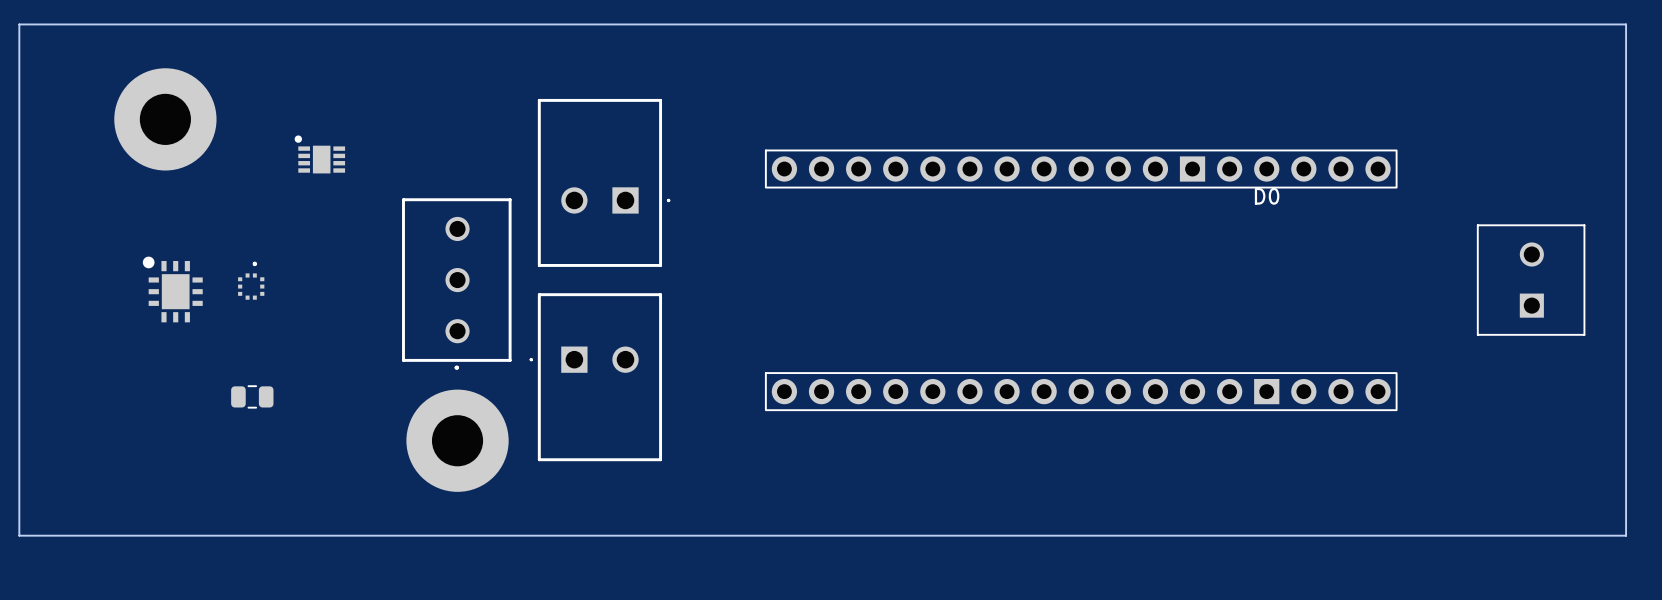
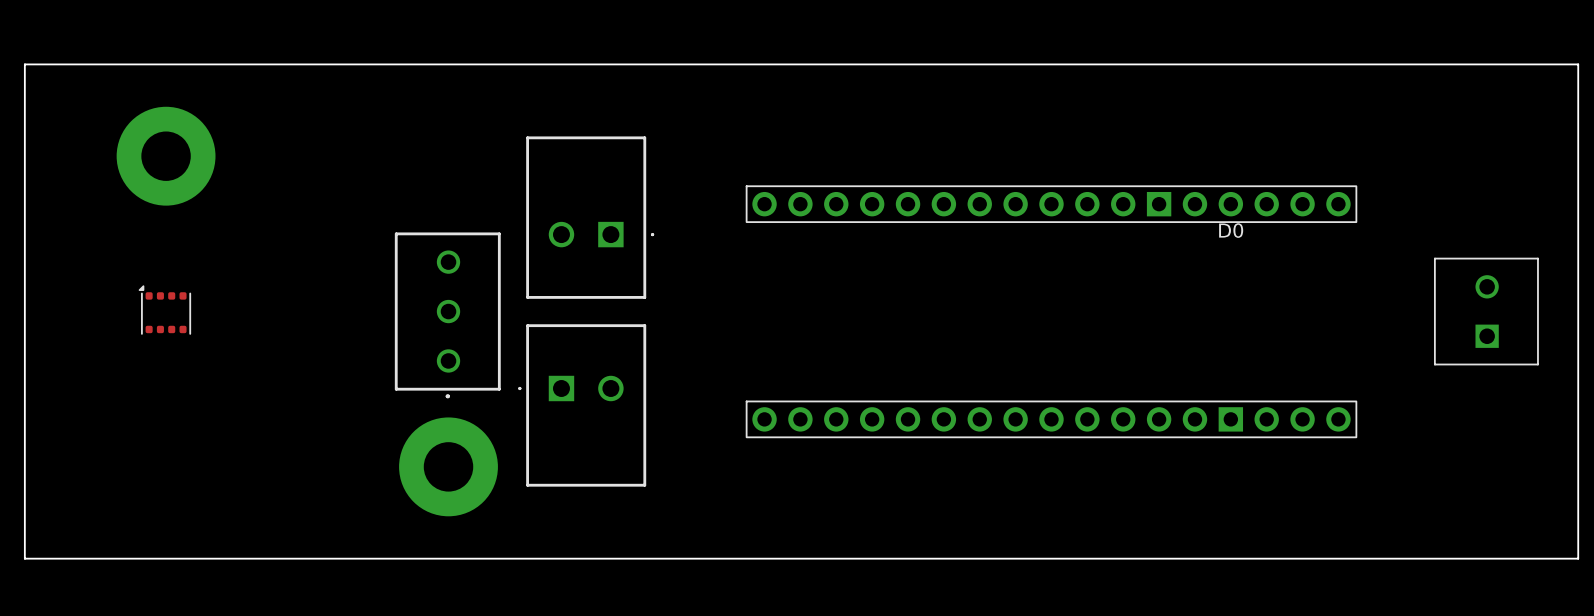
part: (319, 154) -> none
part footprint: [142, 256, 203, 323] -> [138, 285, 192, 335]
part: (251, 280) -> none
part: (252, 396) -> none

